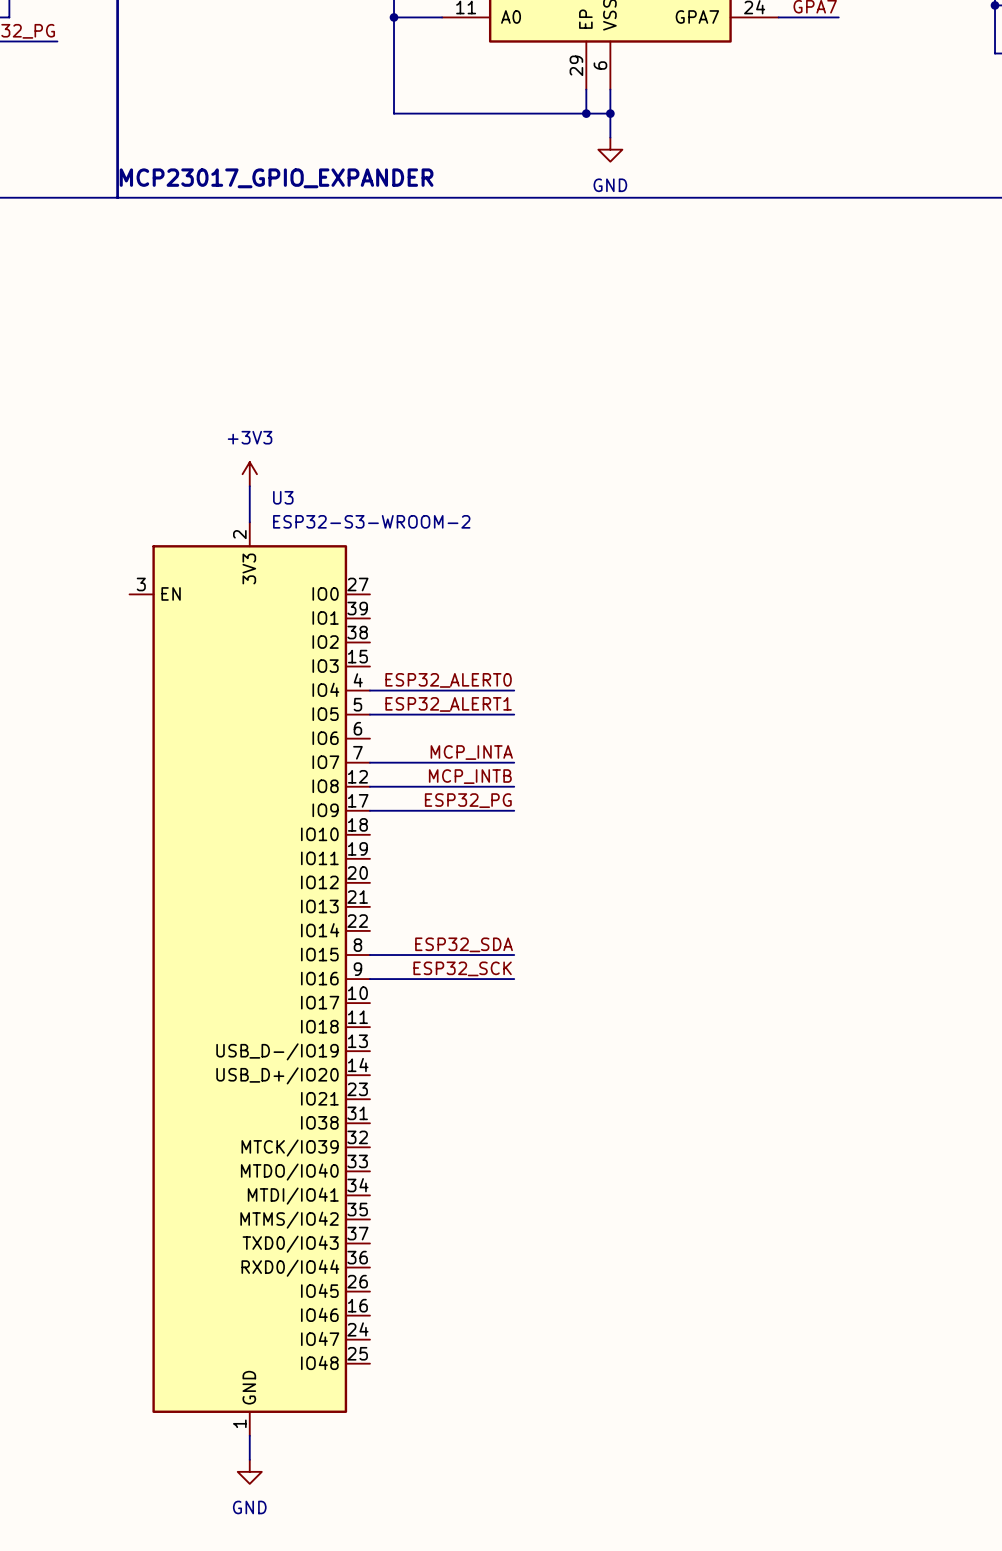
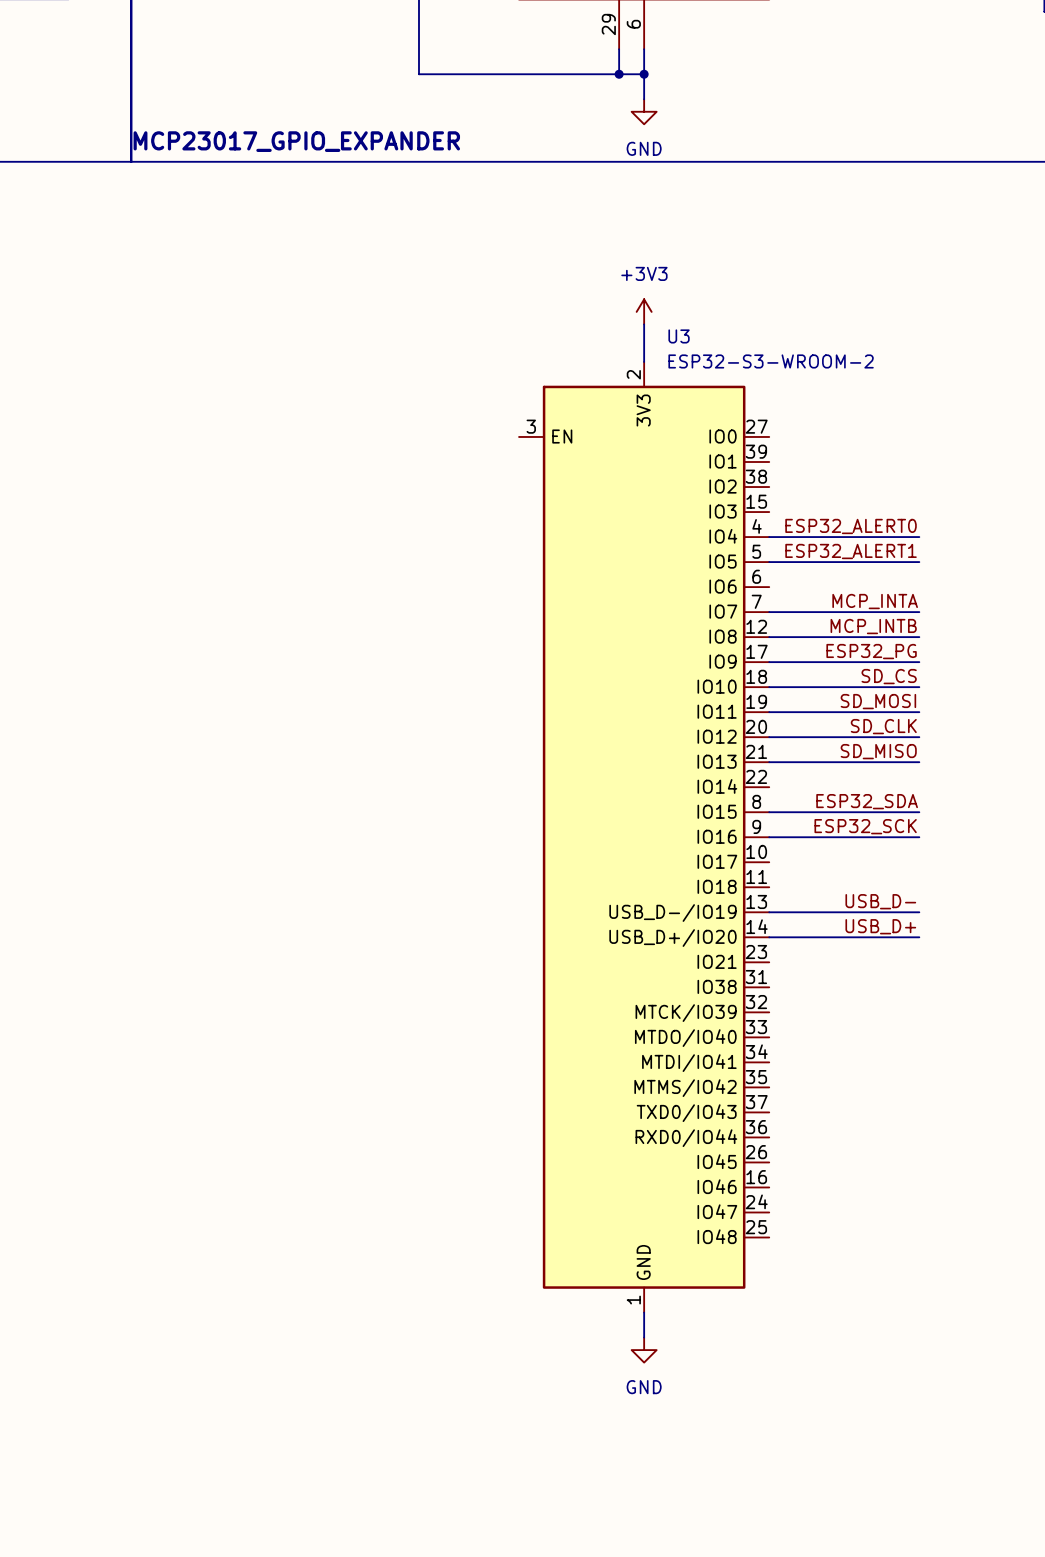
power symbol: none -> +3V3 (644, 311)
wire: none -> (644, 324) (644, 361)
power symbol: +3V3 (249, 474) -> none
wire: (249, 486) (249, 522) -> none
label: none -> ESP32_ALERT0 (851, 526)
wire: none -> (769, 537) (919, 537)
label: none -> ESP32_ALERT1 (851, 551)
wire: none -> (769, 562) (919, 562)
label: none -> MCP_INTA (875, 601)
wire: none -> (769, 612) (919, 612)
label: none -> MCP_INTB (873, 626)
wire: none -> (769, 637) (919, 637)
label: none -> ESP32_PG (871, 651)
wire: none -> (769, 662) (919, 662)
label: ESP32_ALERT0 (448, 680) -> none
wire: (369, 690) (514, 690) -> none
label: none -> SD_CS (889, 676)
wire: none -> (769, 687) (919, 687)
label: ESP32_ALERT1 (448, 704) -> none
wire: (369, 714) (514, 714) -> none
label: none -> SD_MOSI (878, 701)
wire: none -> (769, 712) (919, 712)
label: none -> SD_CLK (883, 726)
wire: none -> (769, 737) (919, 737)
label: MCP_INTA (471, 752) -> none
wire: (369, 762) (514, 762) -> none
label: none -> SD_MISO (878, 751)
wire: none -> (769, 762) (919, 762)
label: MCP_INTB (470, 776) -> none
wire: (369, 786) (514, 786) -> none
label: ESP32_PG (468, 800) -> none
wire: (369, 810) (514, 810) -> none
label: none -> ESP32_SDA (867, 801)
wire: none -> (769, 812) (919, 812)
label: none -> ESP32_SCK (865, 826)
wire: none -> (769, 837) (919, 837)
label: none -> USB_D- (880, 901)
wire: none -> (769, 912) (919, 912)
label: none -> USB_D+ (880, 926)
wire: none -> (769, 937) (919, 937)
label: ESP32_SDA (464, 944) -> none
wire: (369, 955) (514, 955) -> none
label: ESP32_SCK (462, 968) -> none
U3 position: (249, 979) -> (644, 837)
wire: (369, 979) (514, 979) -> none
wire: none -> (644, 1312) (644, 1337)
power symbol: none -> GND (644, 1350)
wire: (249, 1435) (249, 1459) -> none
power symbol: GND (249, 1471) -> none

